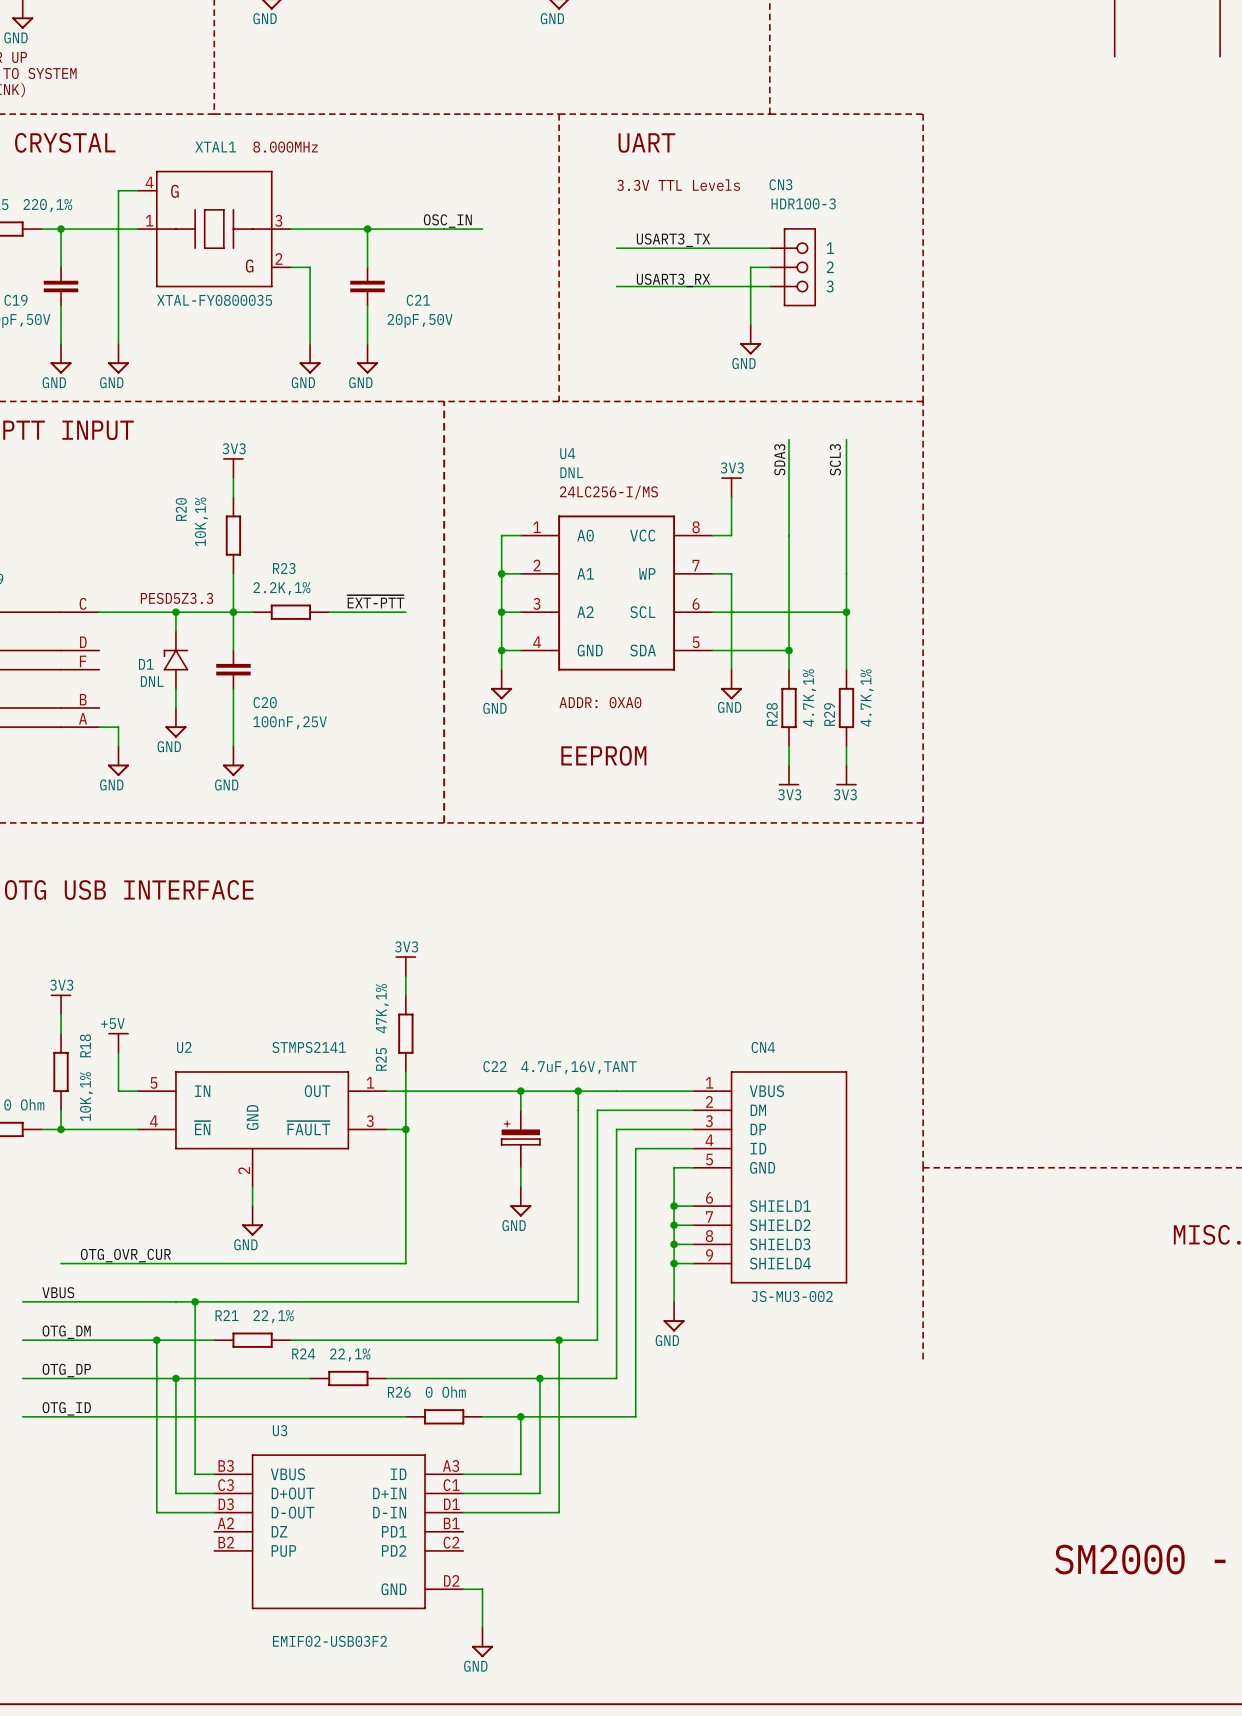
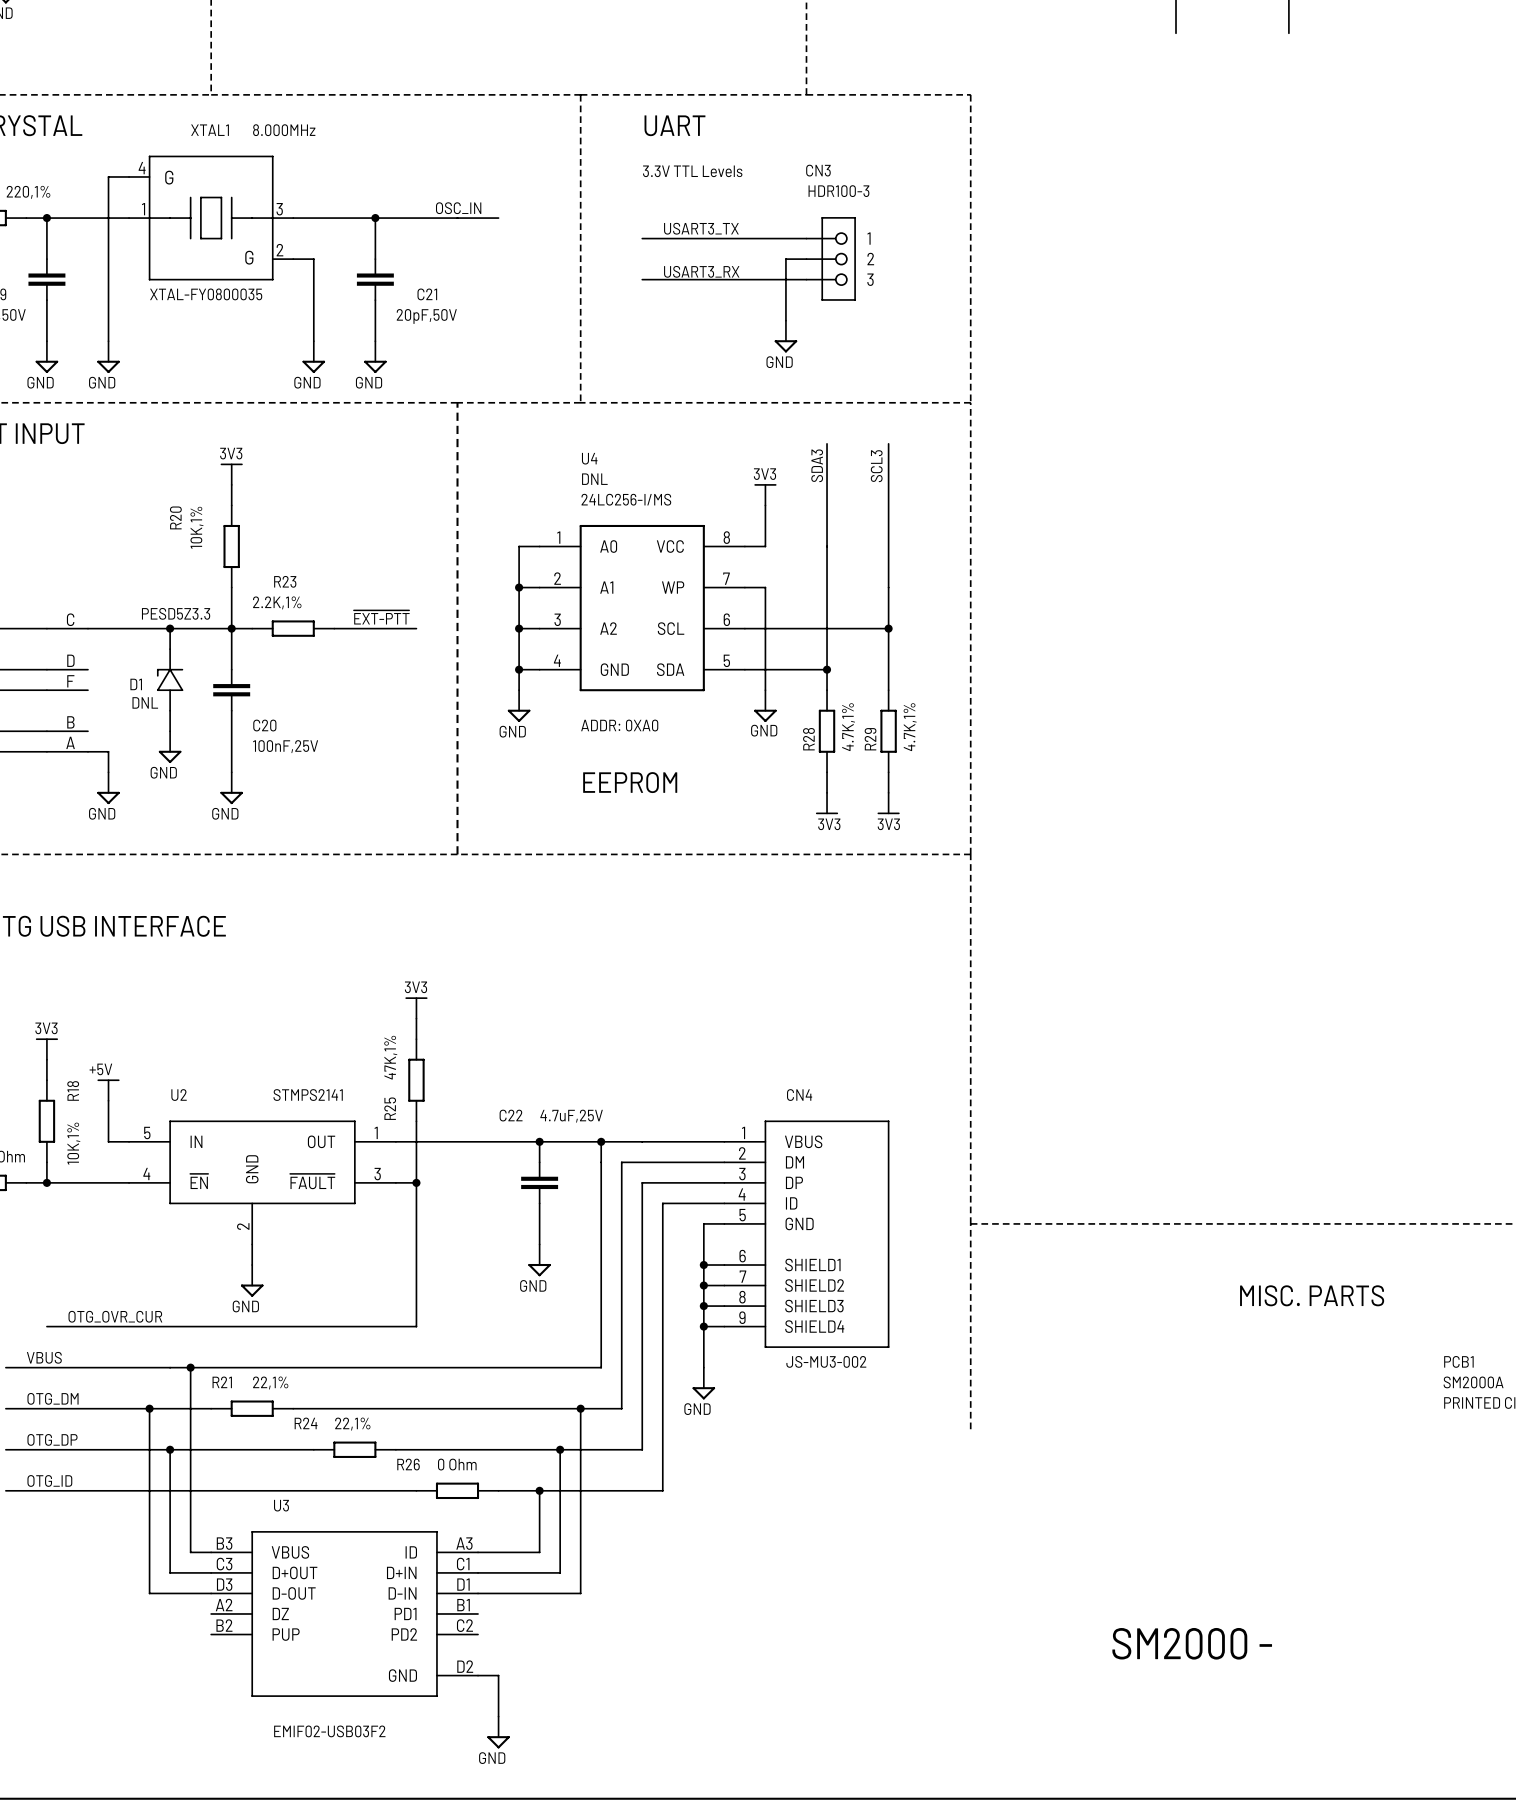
C22 value: 4.7uF,16V,TANT (578, 1067) -> 4.7uF,25V (571, 1116)
C22 symbol: [501, 1110, 541, 1168] -> [521, 1161, 559, 1205]

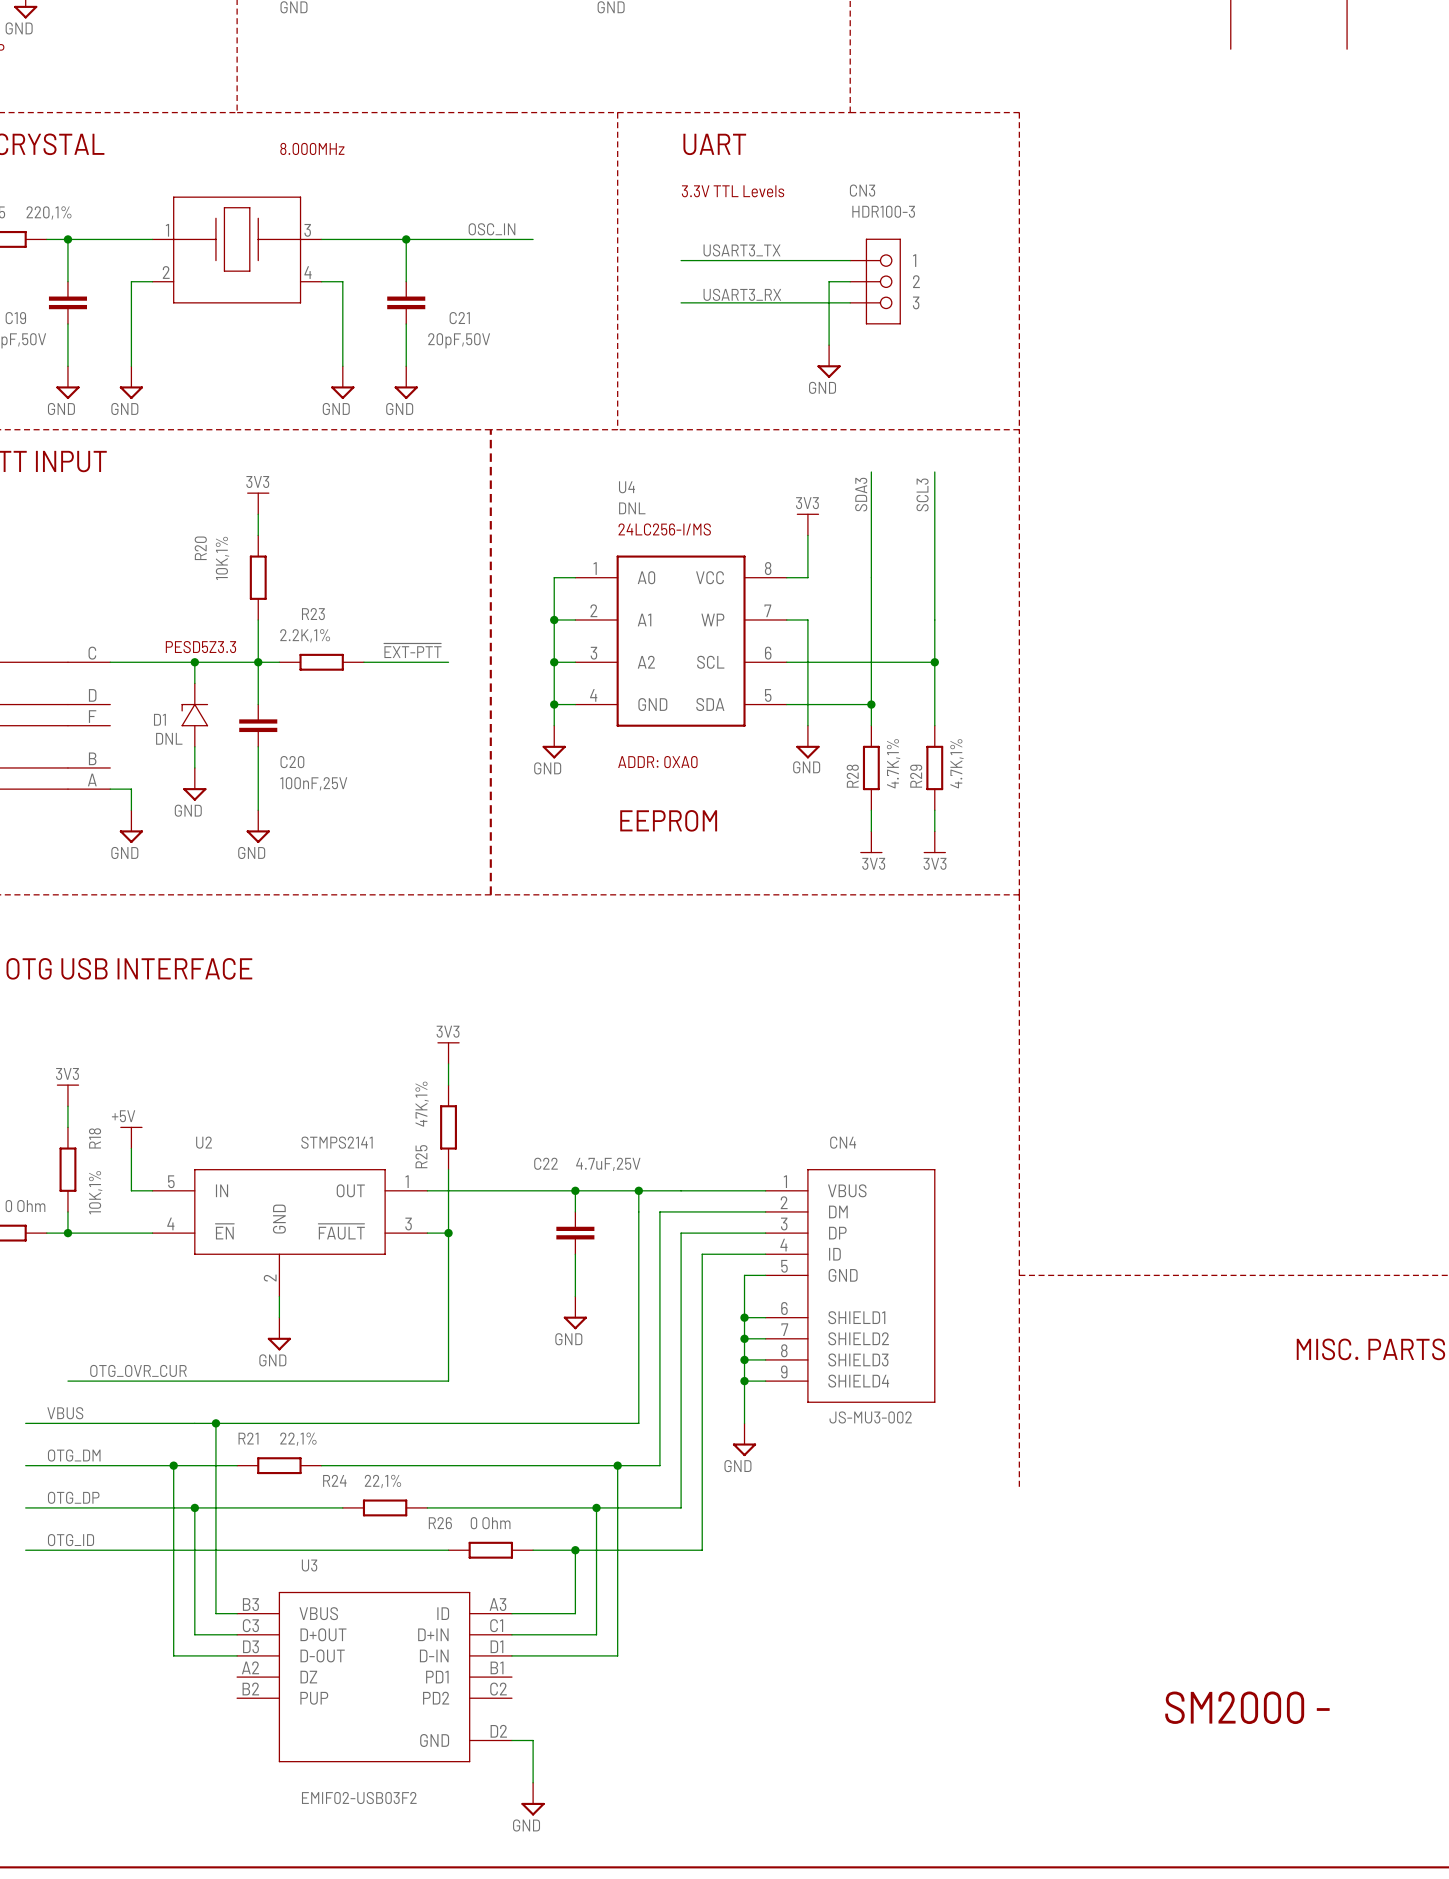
wire: (129, 176) (108, 176) (108, 259) -> (152, 281) (131, 281)
XTAL1: XTAL-FY0800035 (211, 218) -> none
part: none -> (237, 250)

